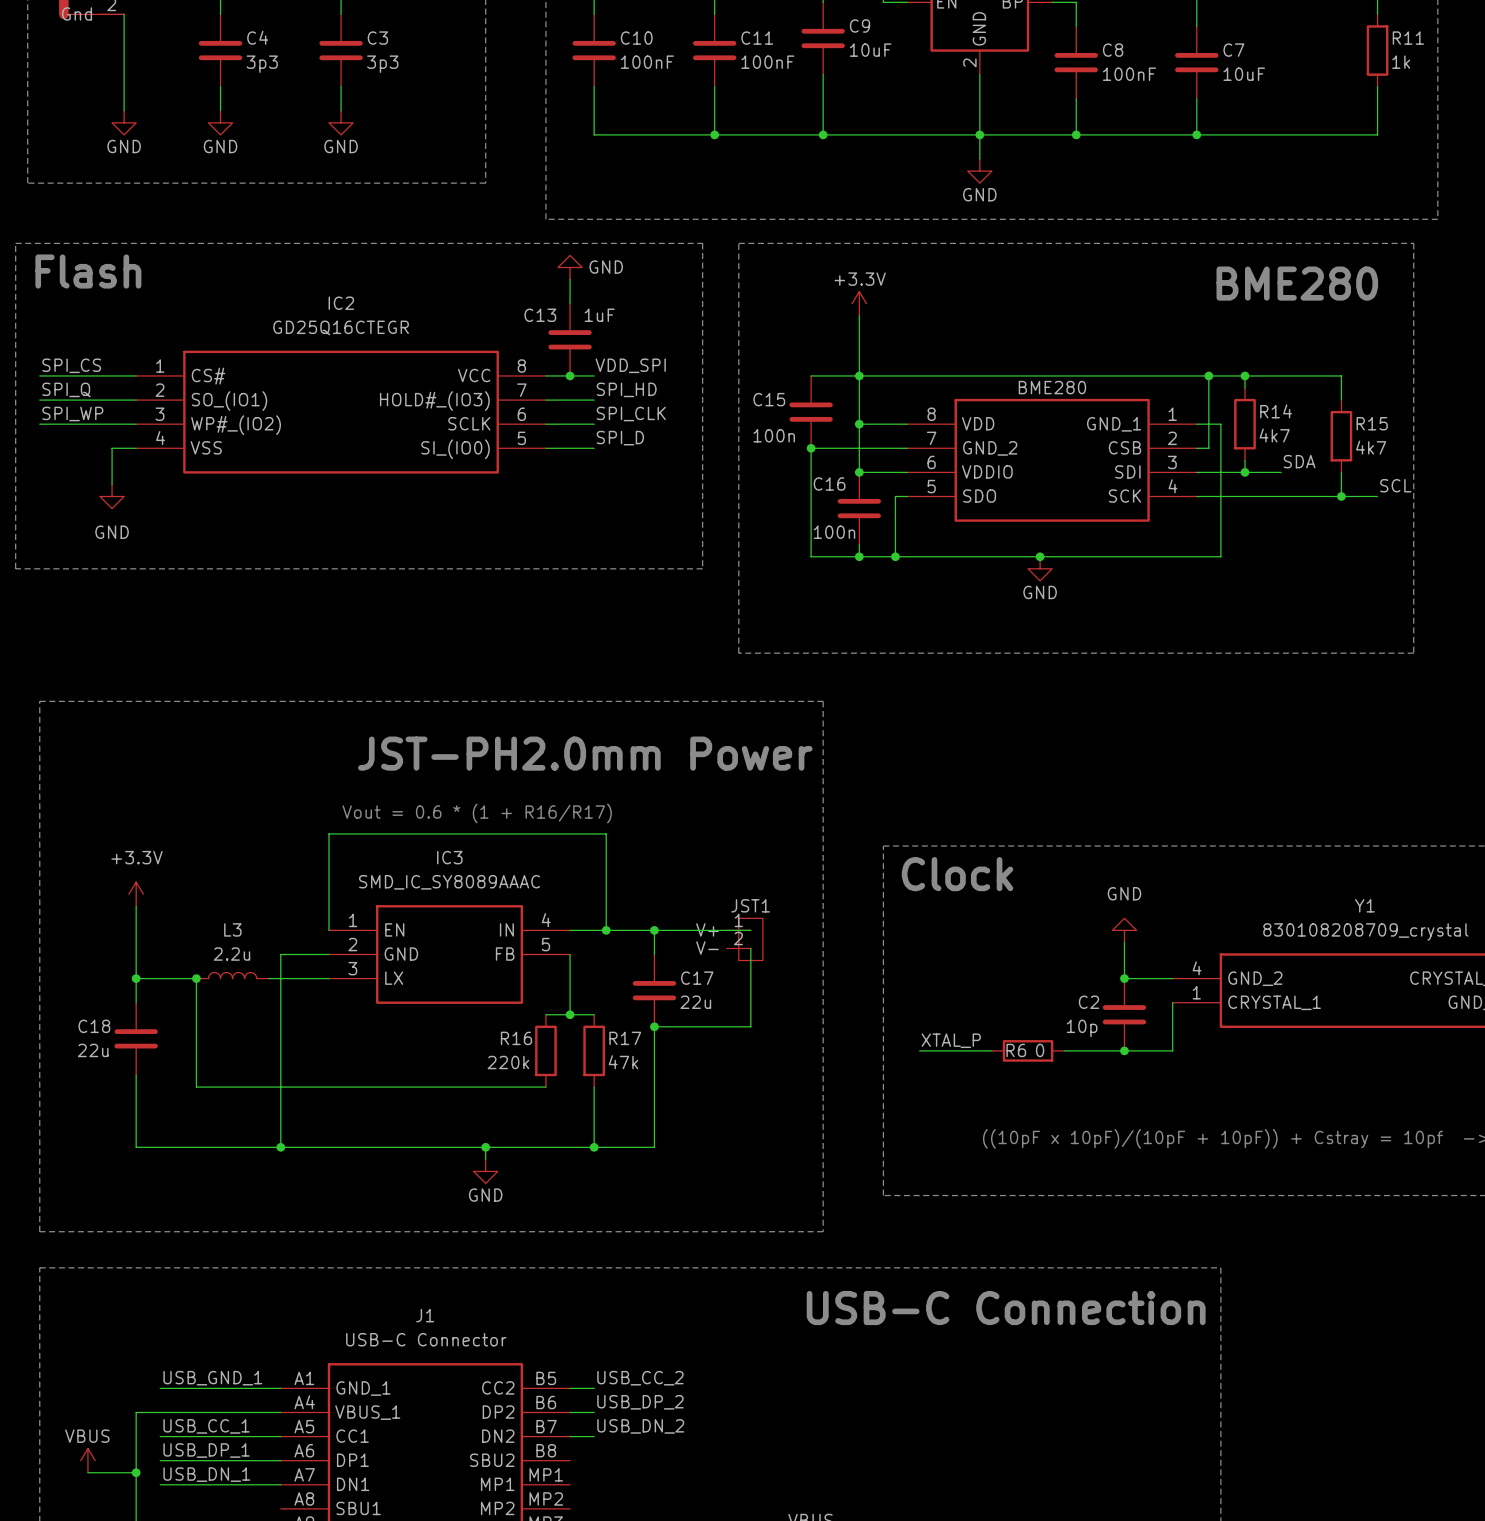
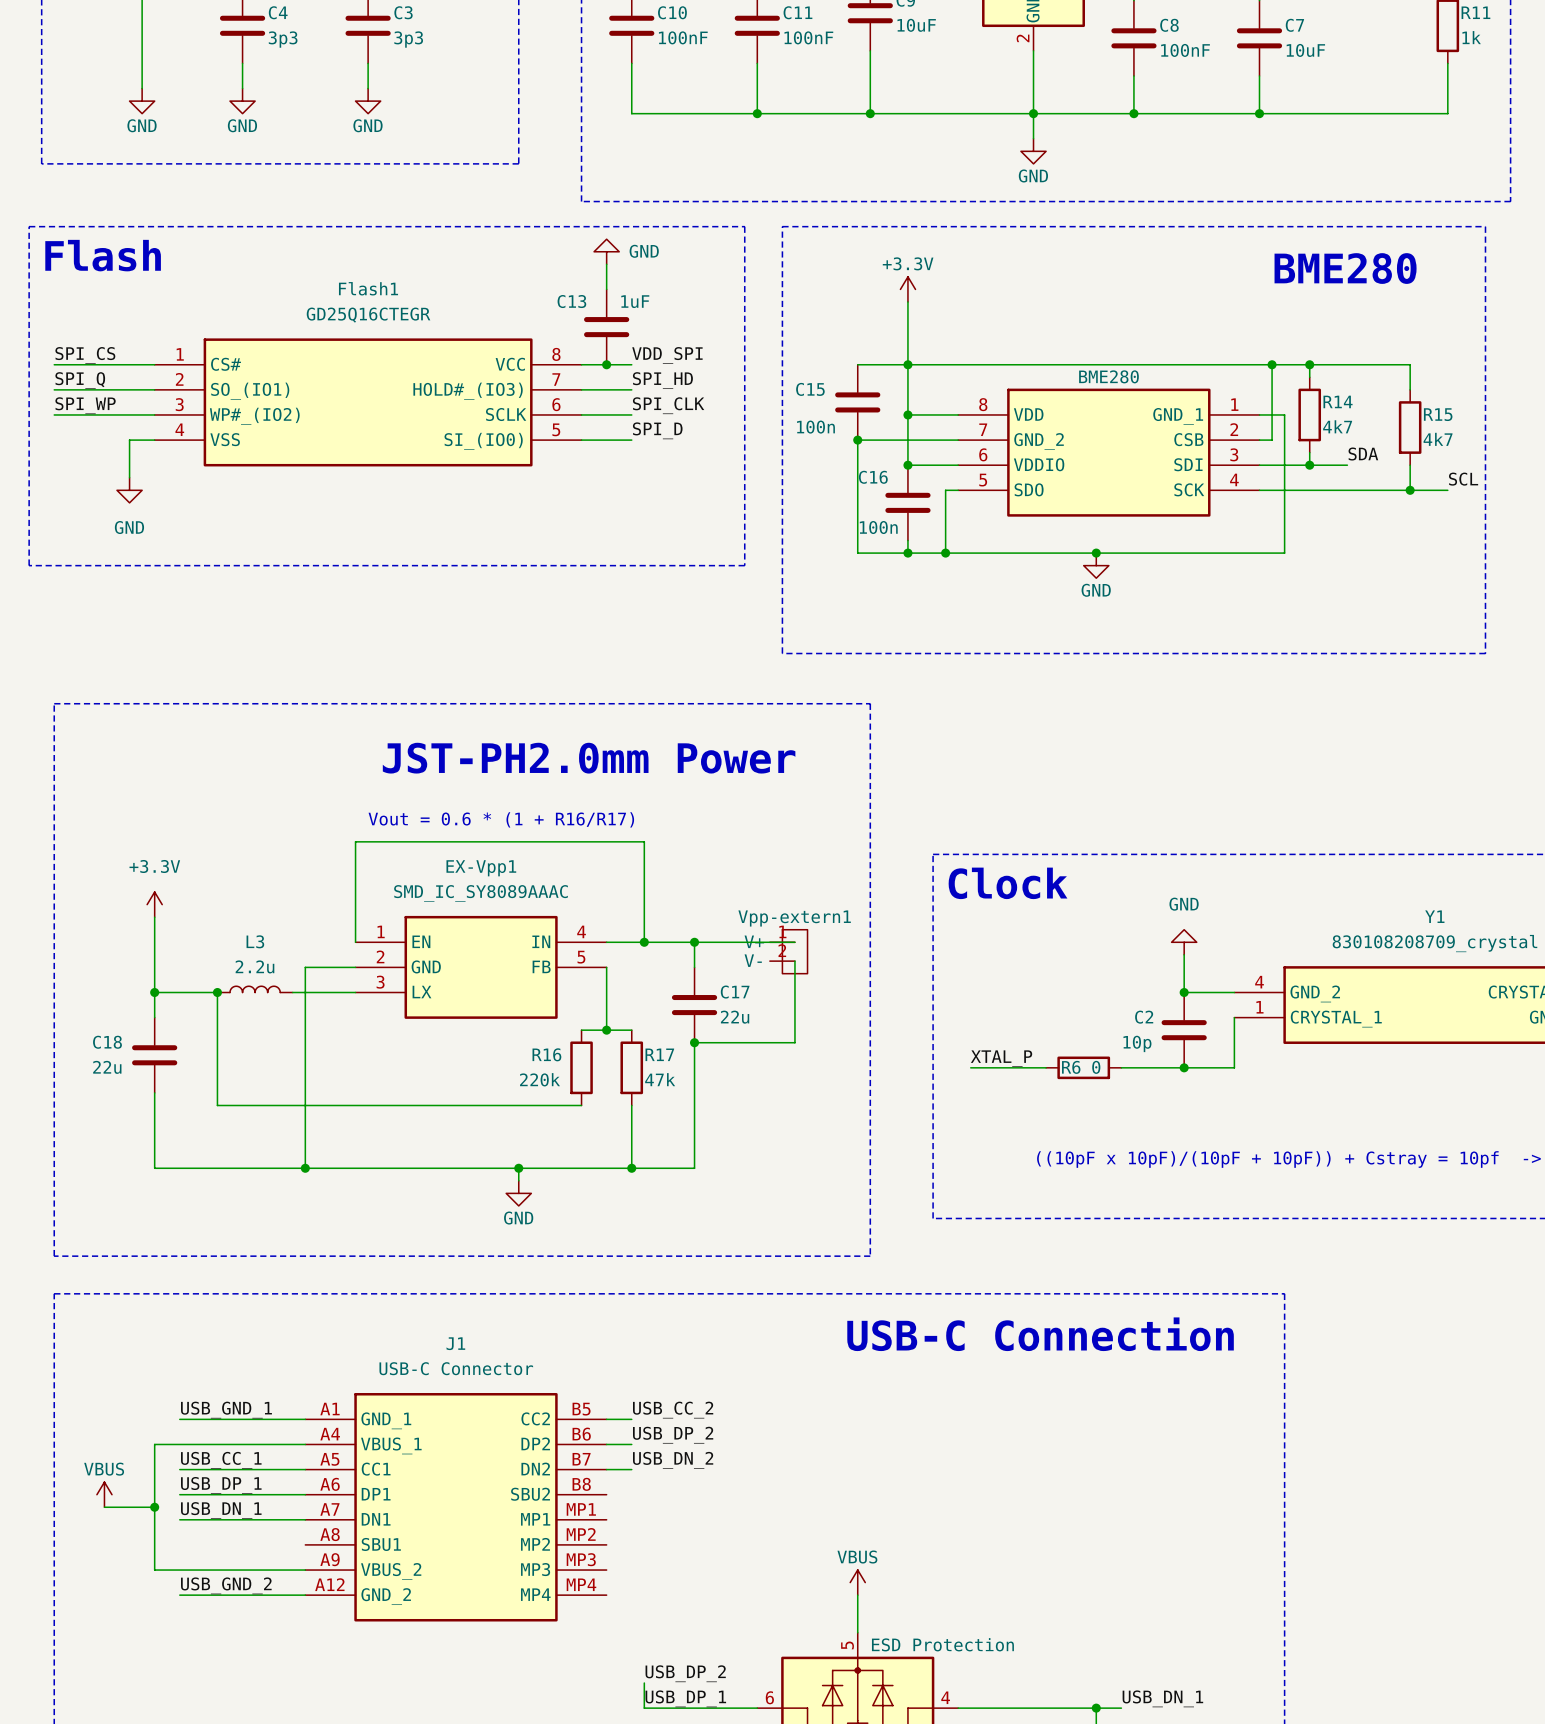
IC2 name: IC2 (341, 303) -> Flash1 (368, 288)
IC3 name: IC3 (449, 857) -> EX-Vpp1 (481, 868)
JST1 name: JST1 (750, 905) -> Vpp-extern1 (794, 918)

